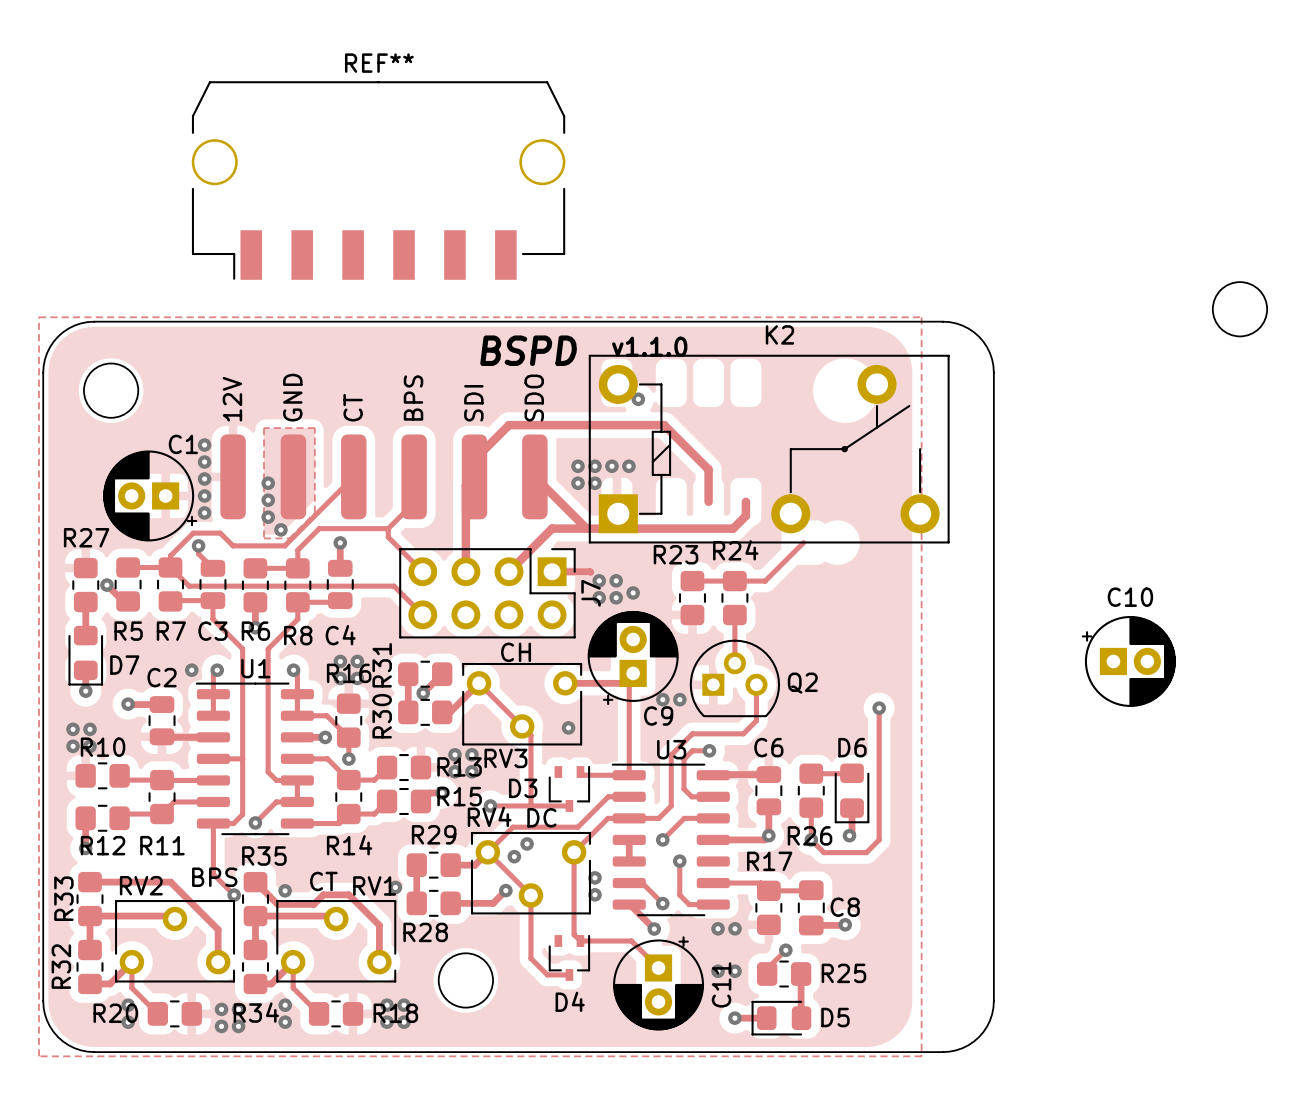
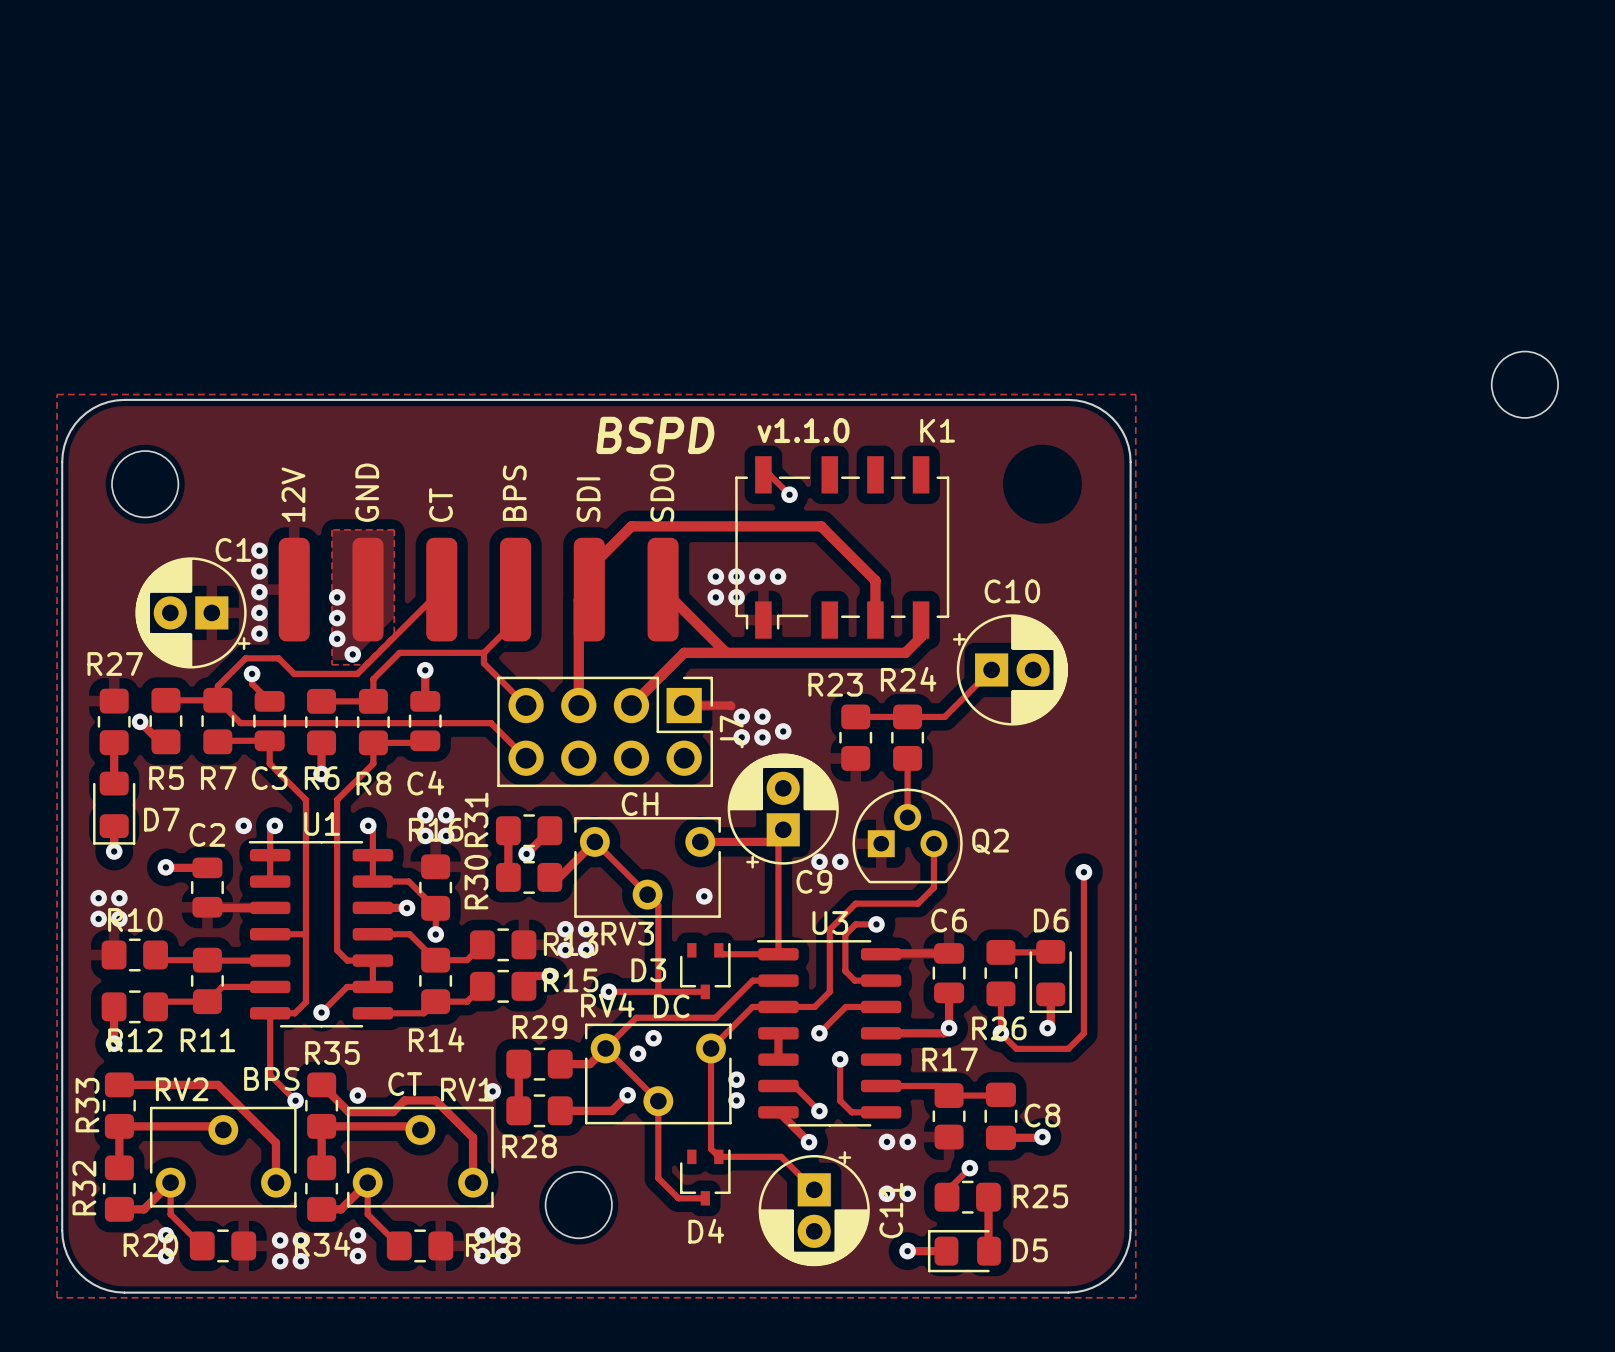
REF**: (378, 180) -> none
board edge: (866, 321) (942, 321) (962, 325) (973, 332) (983, 341) (989, 353) (993, 372) (993, 1007) (989, 1020) (983, 1032) (973, 1041) (962, 1048) (942, 1052) (866, 1052) -> (1068, 399) (1092, 404) (1112, 418) (1125, 438) (1130, 462) (1130, 1238) (1122, 1261) (1106, 1279) (1084, 1290) (1068, 1292)
K1: none -> (842, 547)
K2: (769, 449) -> none
C10 position: (1128, 661) -> (1010, 669)

